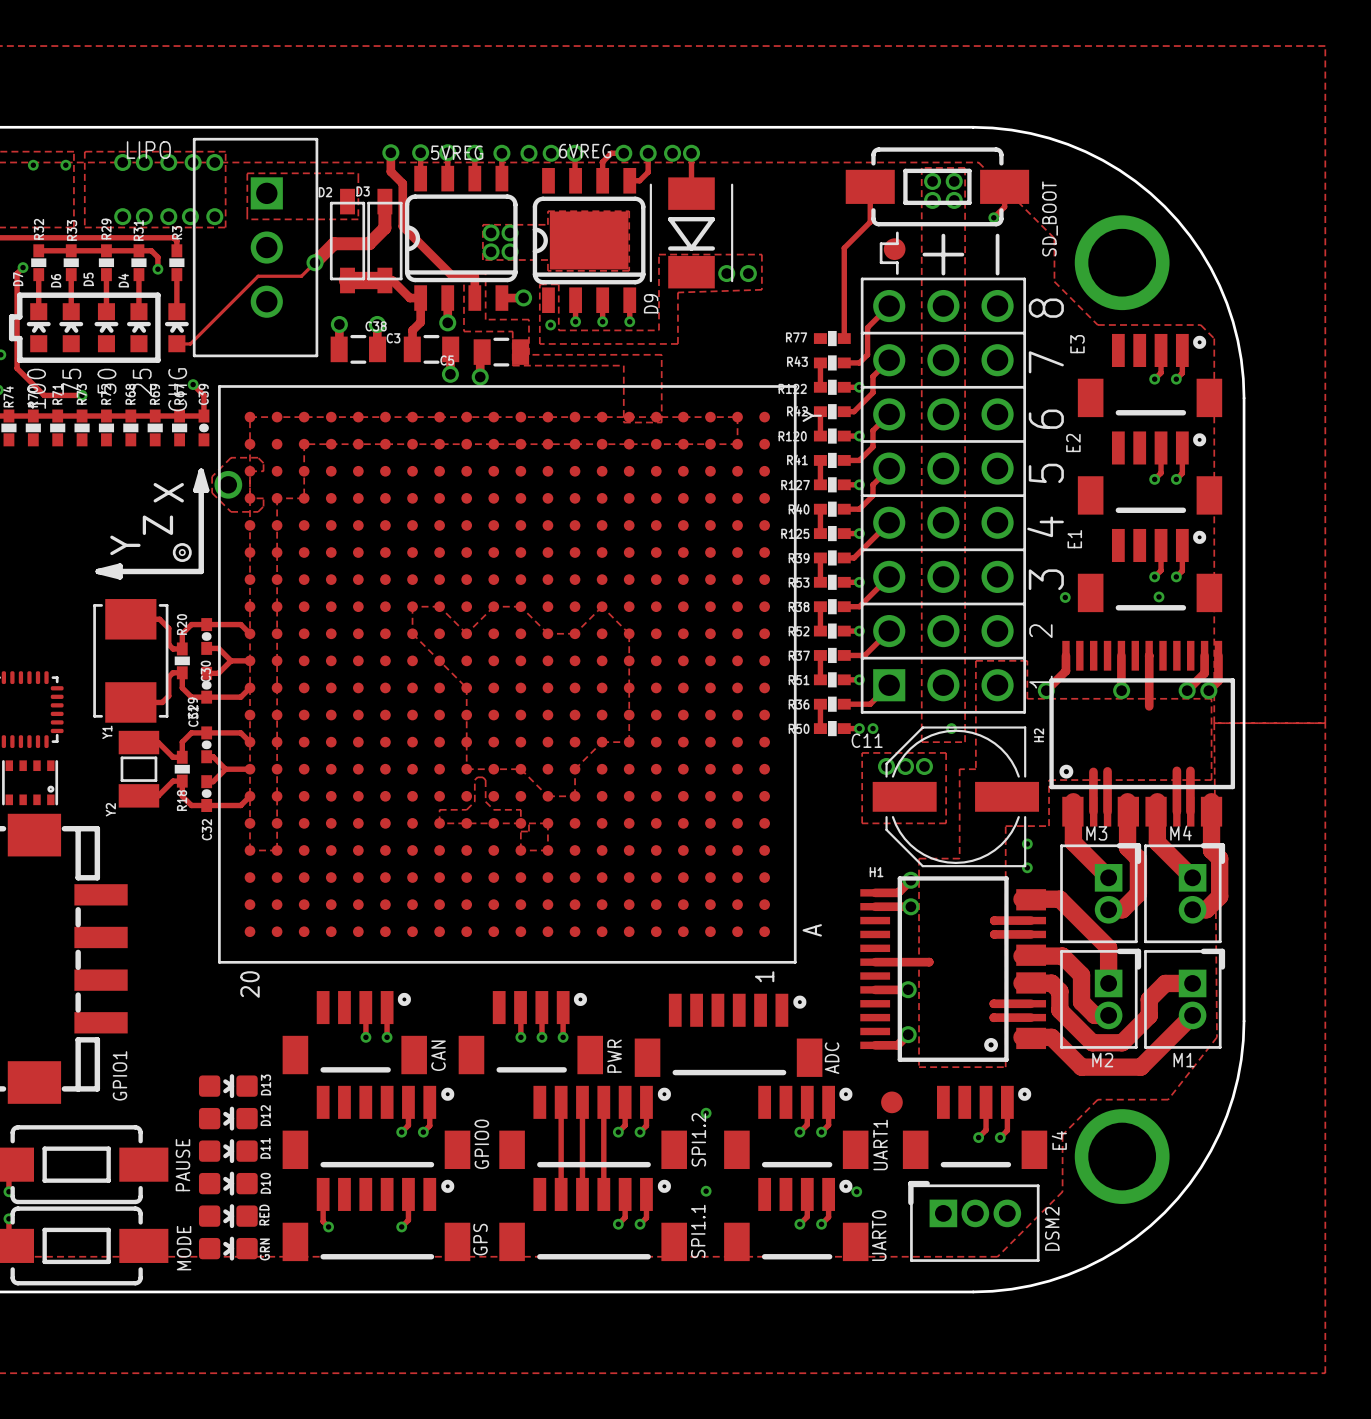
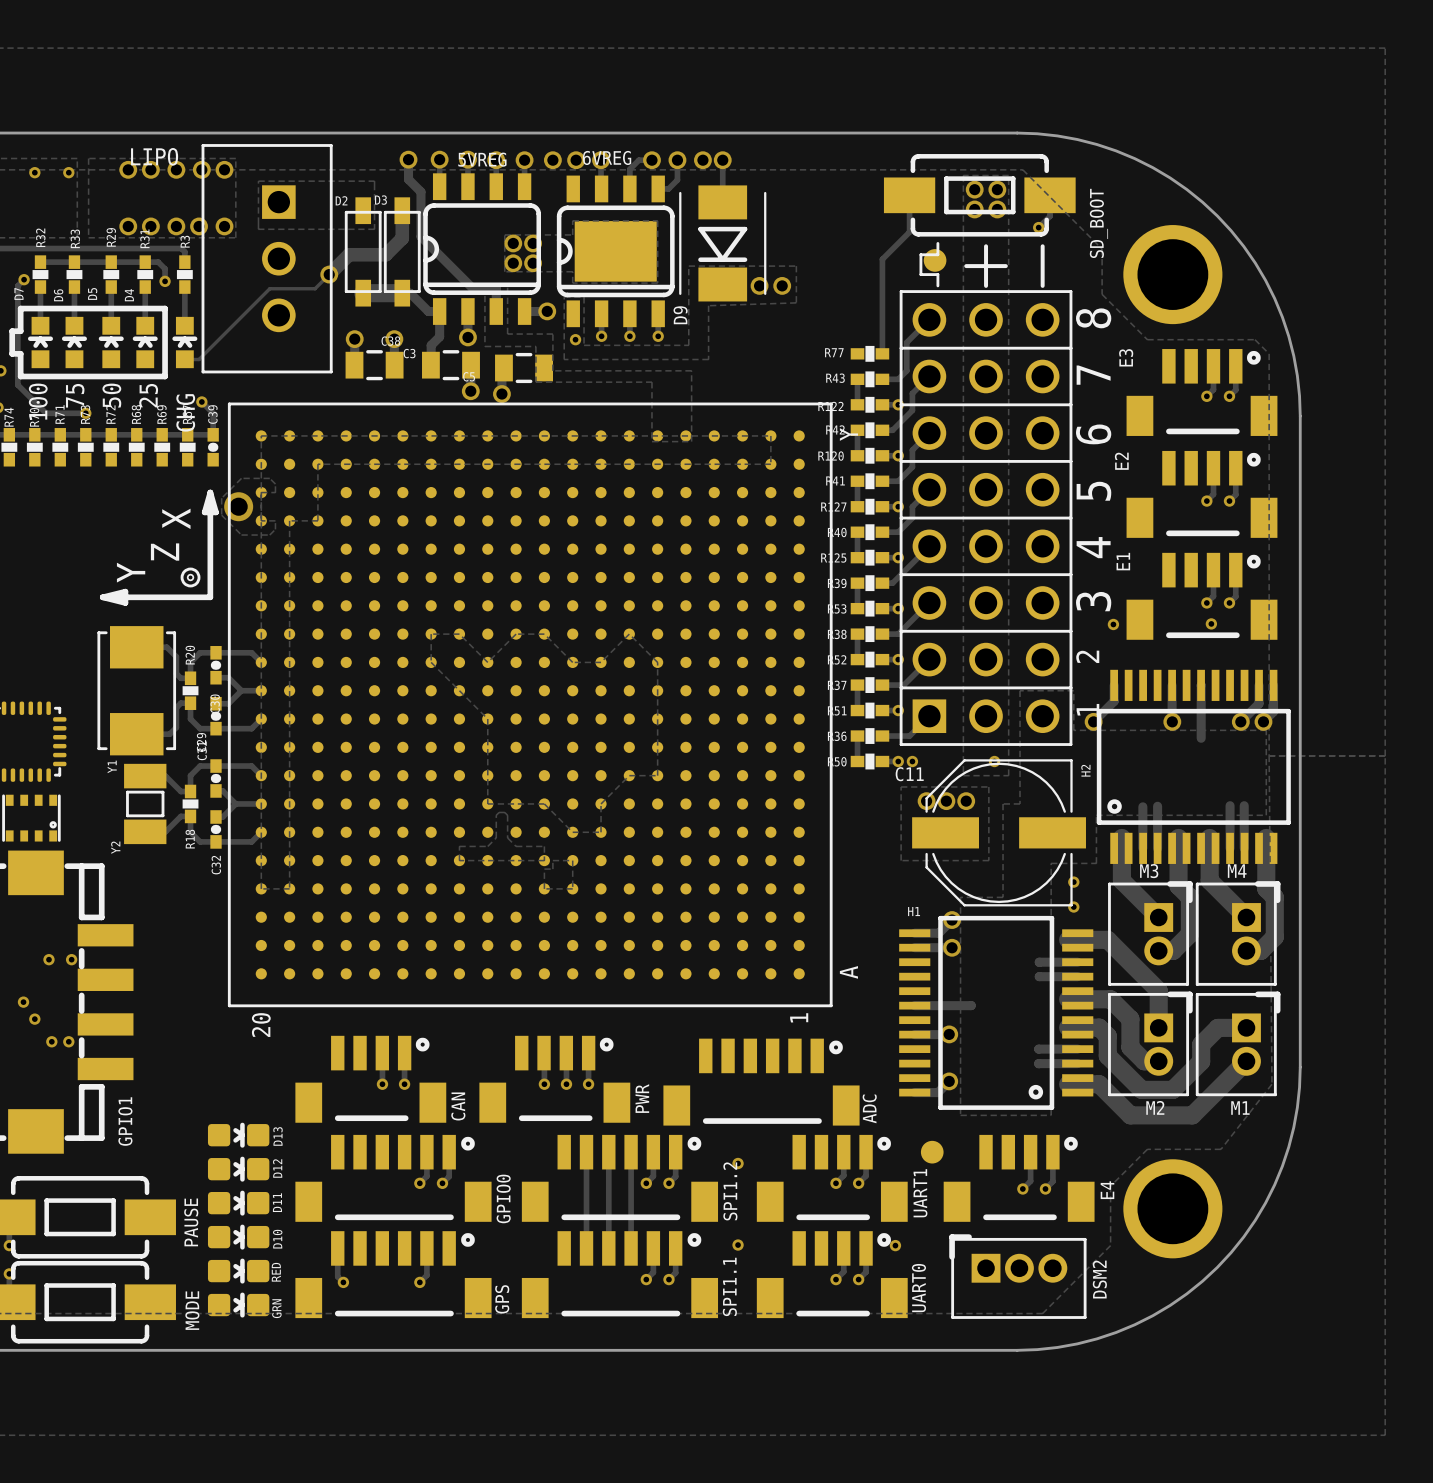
via: none -> (48, 959)
via: none -> (71, 959)
via: none -> (23, 1002)
via: none -> (34, 1019)
via: none -> (51, 1041)
via: none -> (68, 1041)

